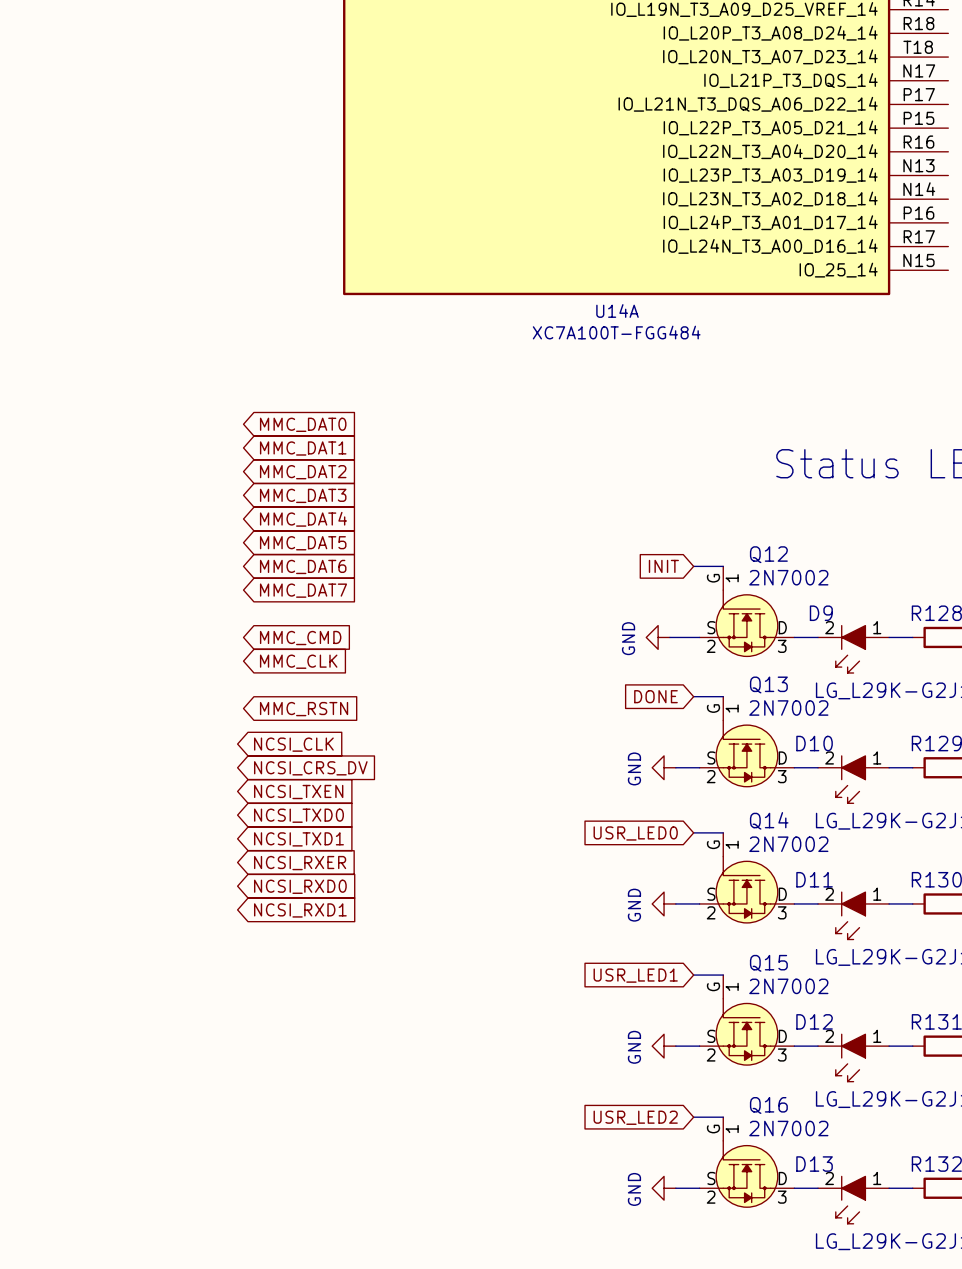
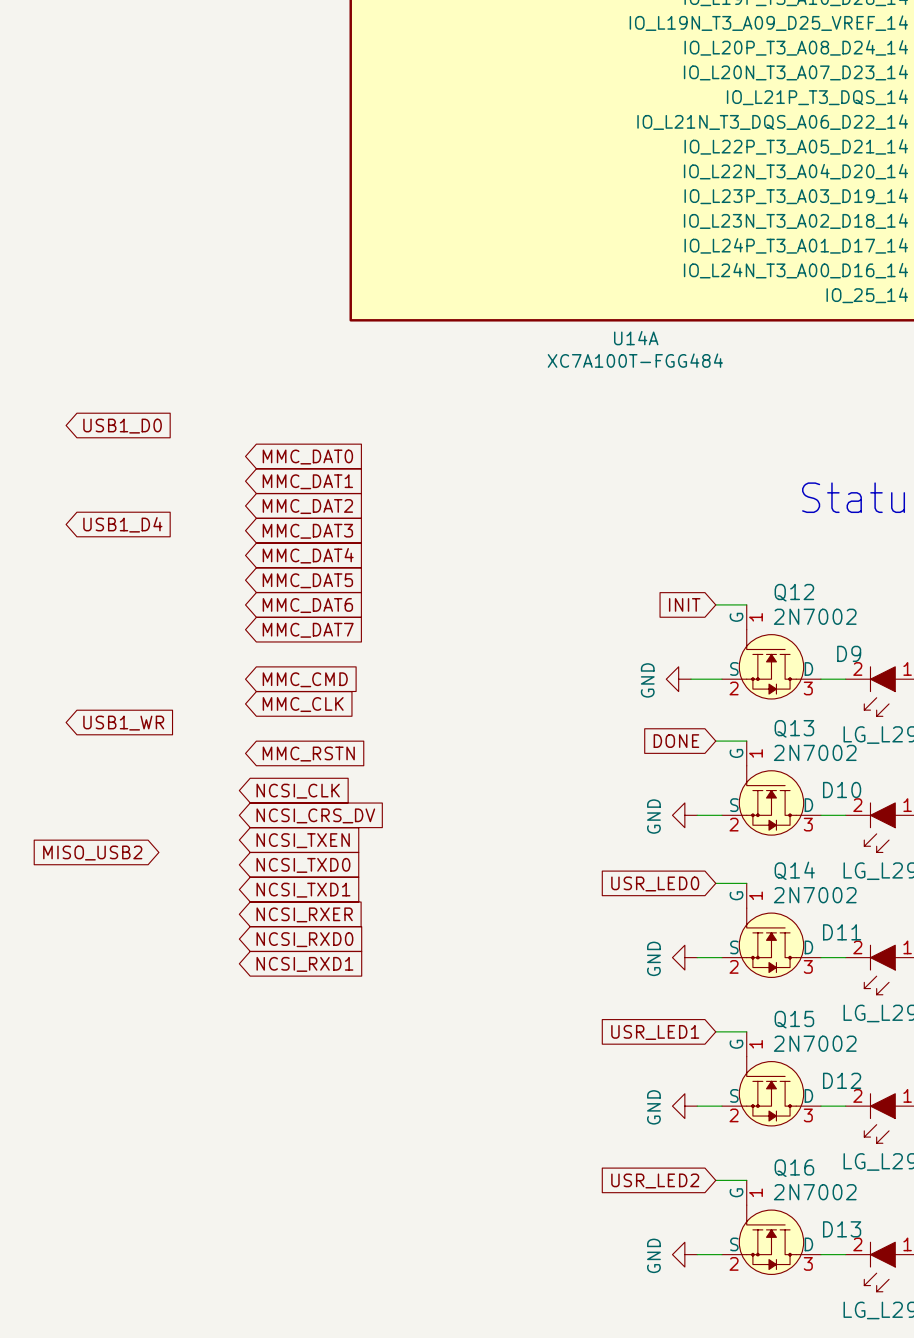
global label: none -> USB1_D0 (122, 426)
global label: none -> USB1_D4 (122, 524)
global label: none -> USB1_WR (123, 723)
global label: none -> MISO_USB2 (92, 853)

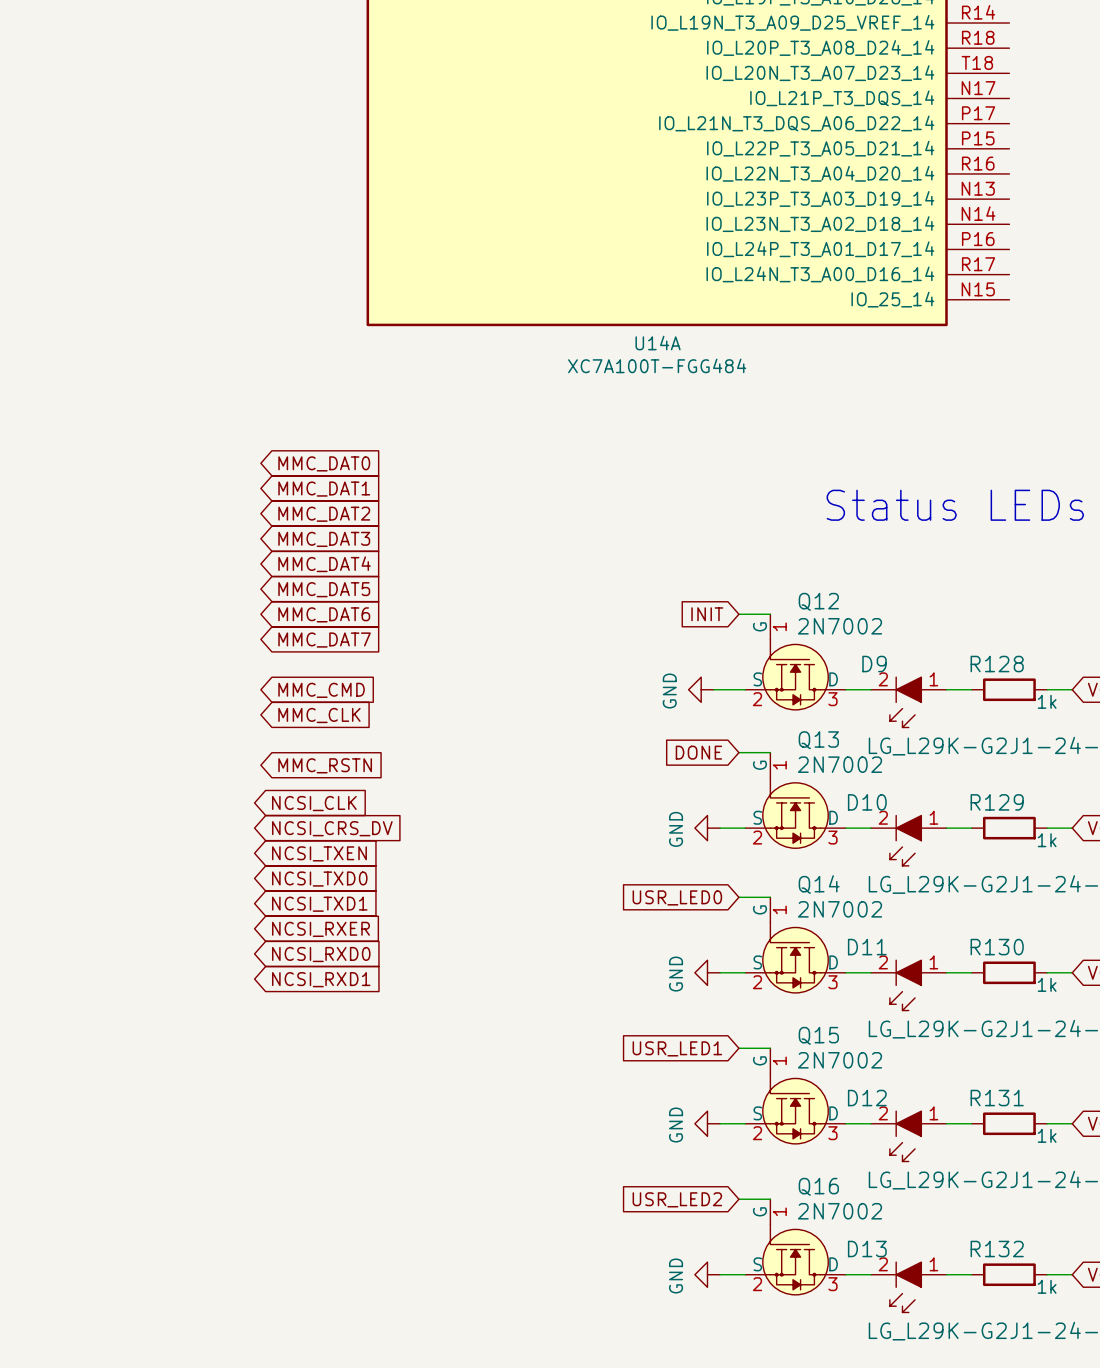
global label: USB1_D0 (122, 426) -> none
global label: USB1_D4 (122, 524) -> none
global label: USB1_WR (123, 723) -> none
global label: MISO_USB2 (92, 853) -> none

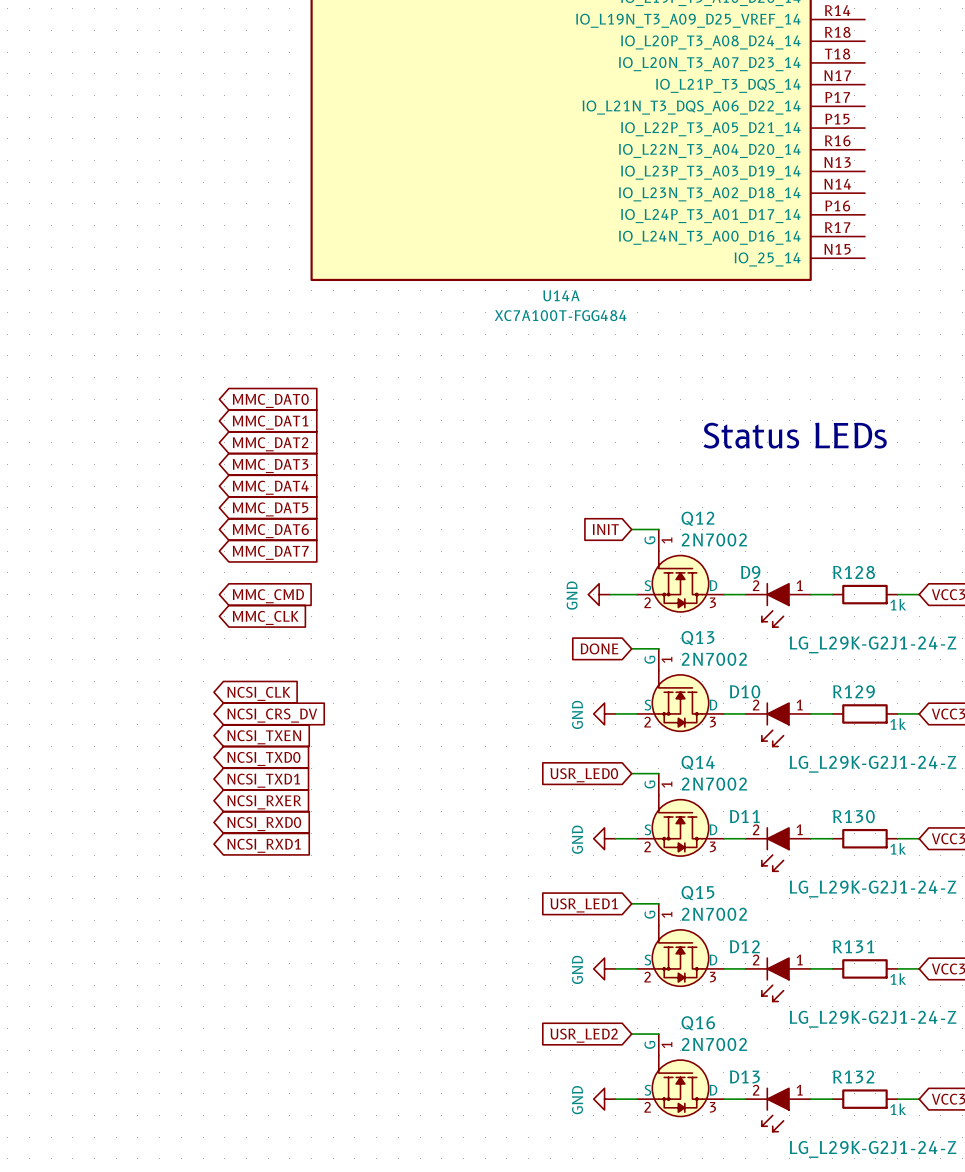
global label: MMC_RSTN (325, 765) -> none

